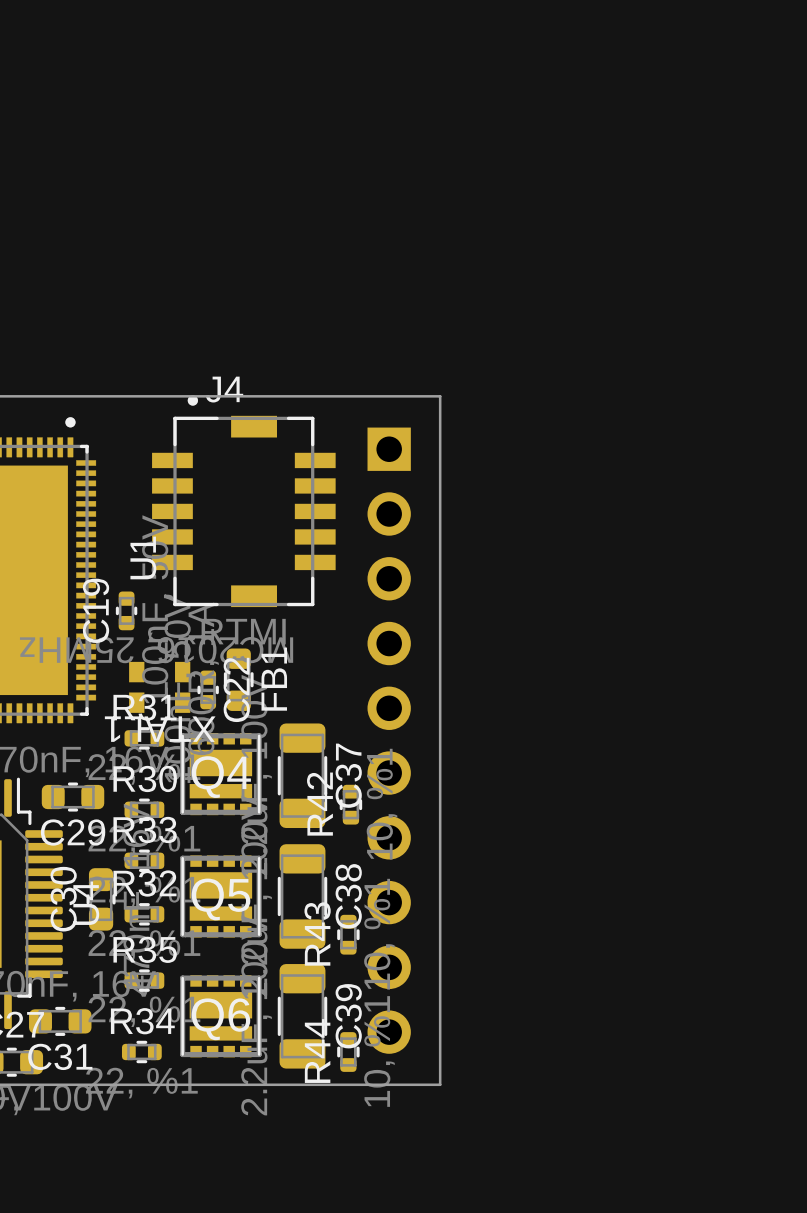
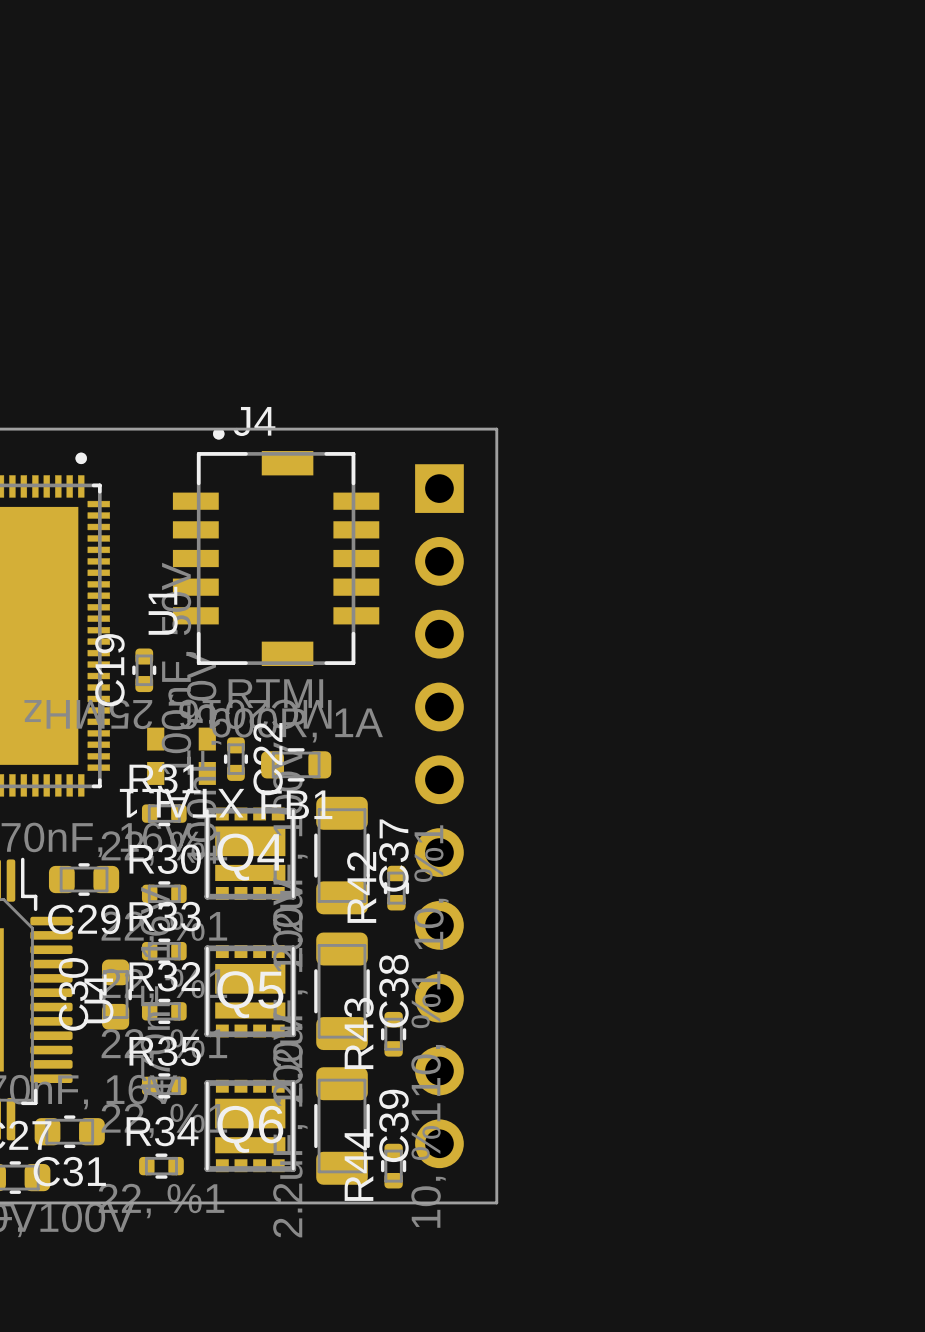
FB1 rotation: 0° (238, 679) -> 90° clockwise (296, 764)

